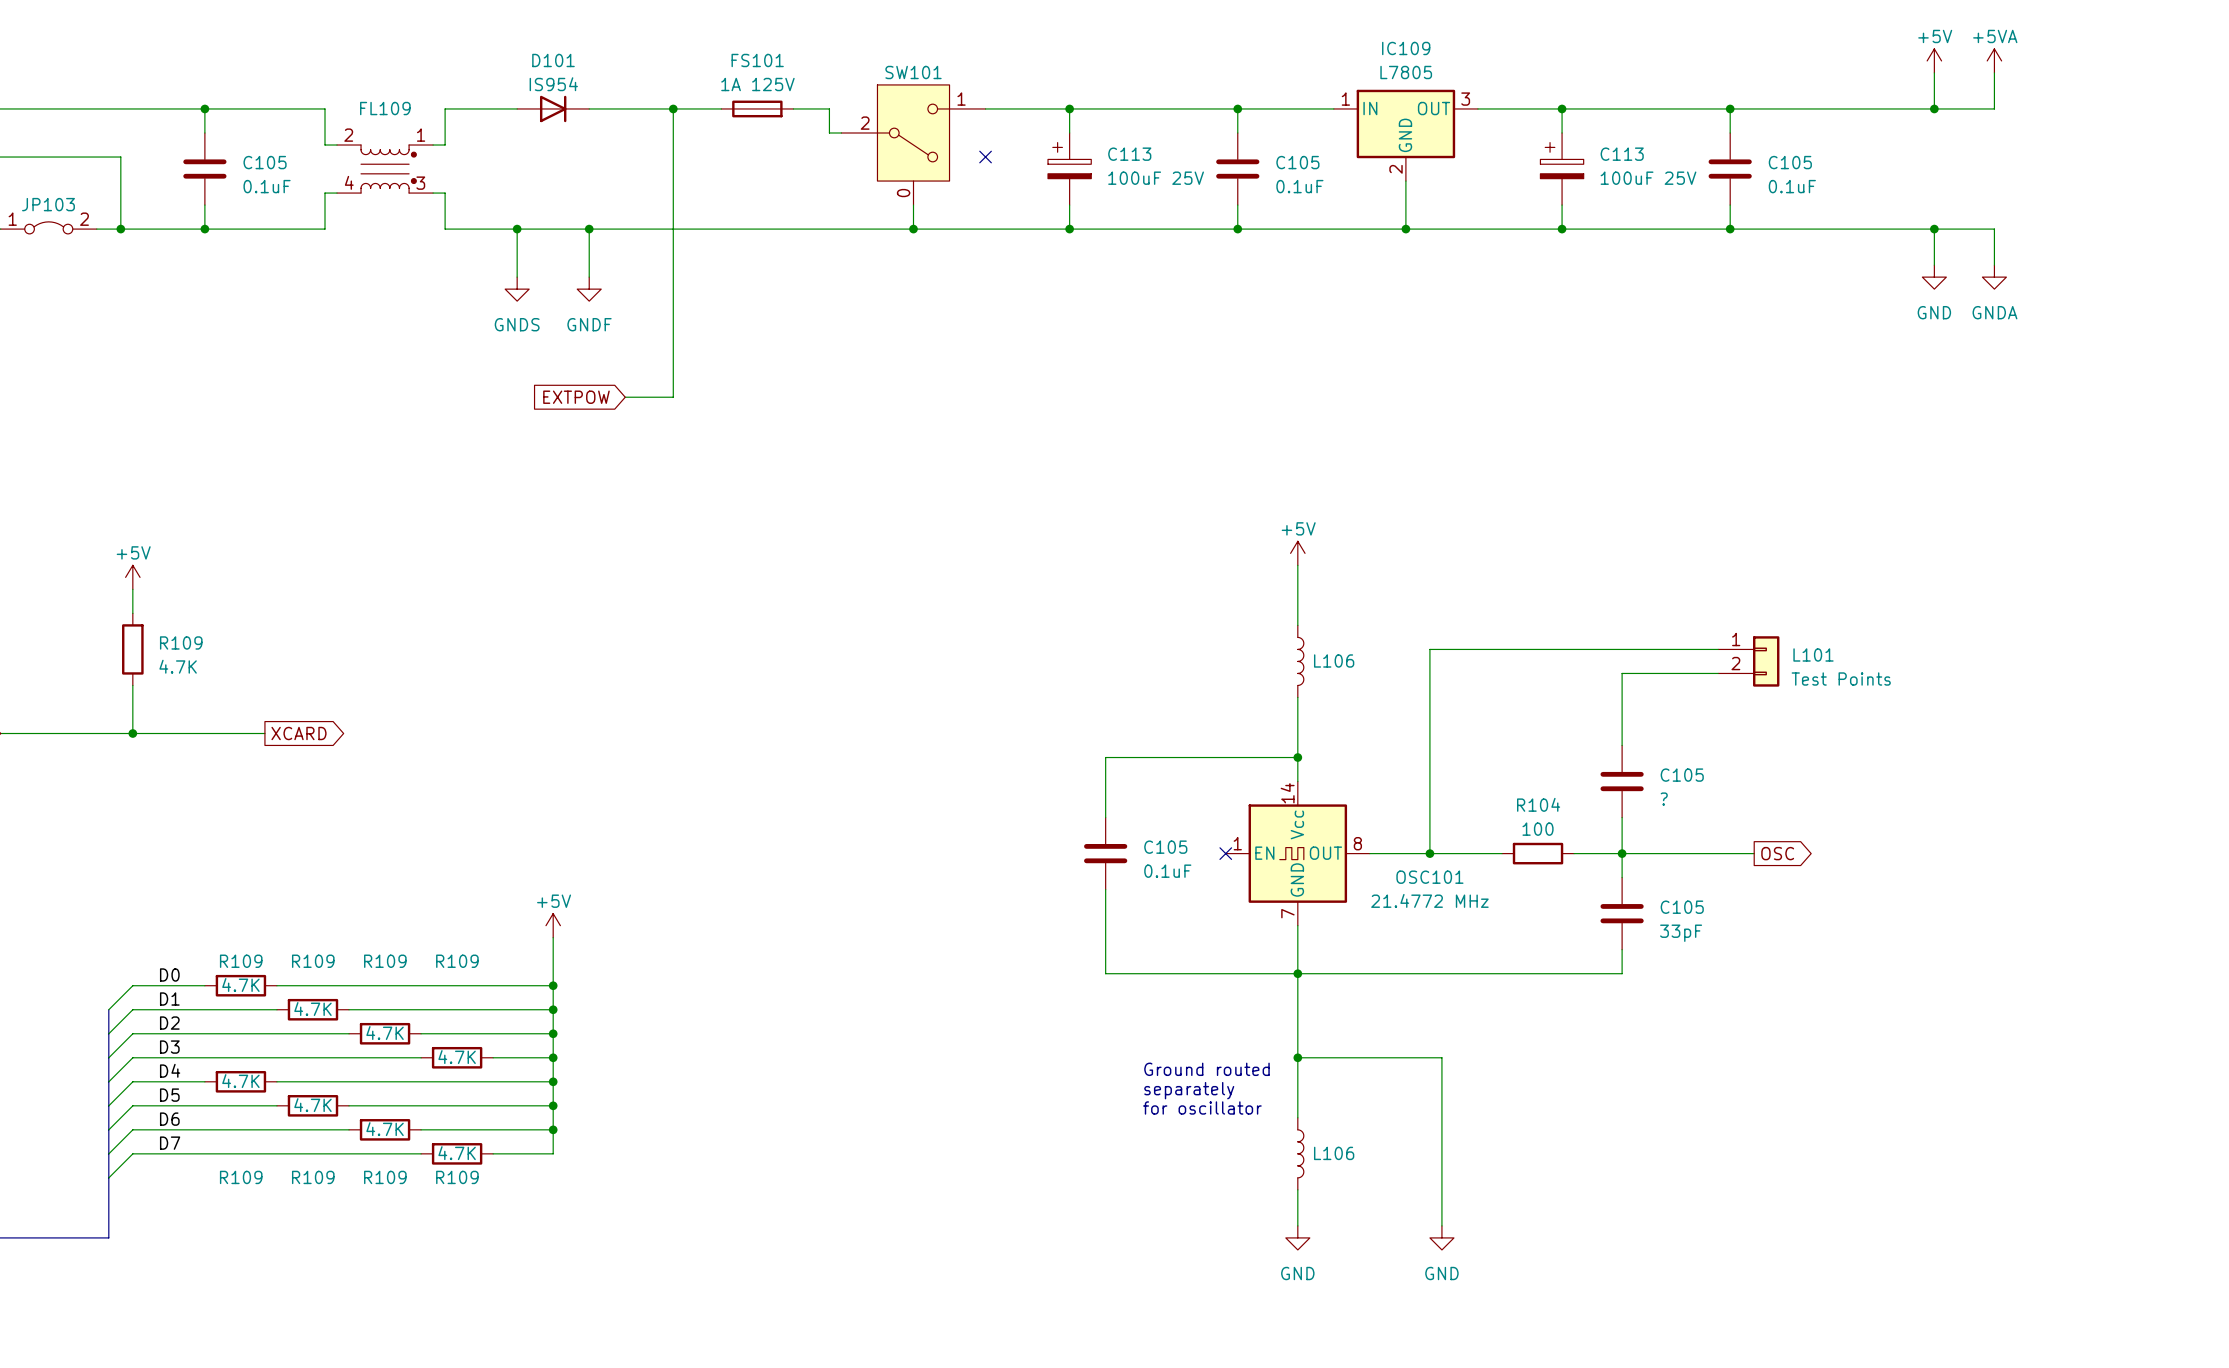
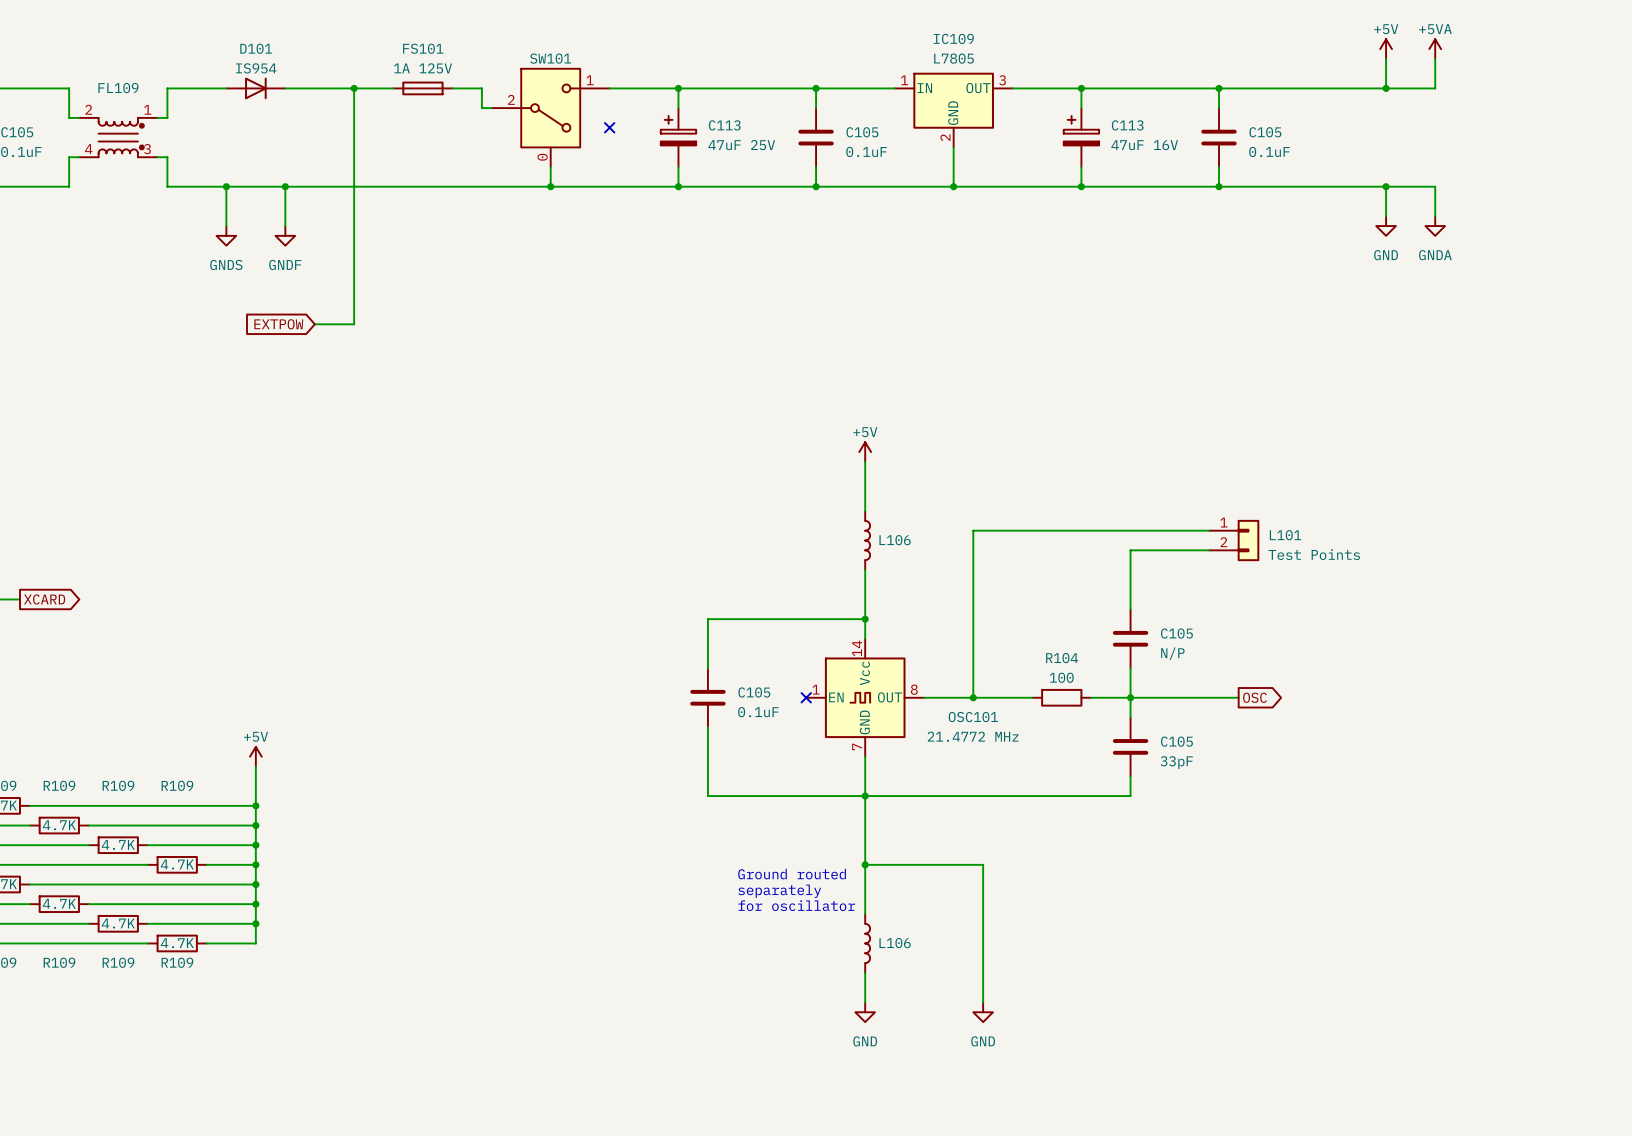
C113 value: 100uF 25V (1156, 178) -> 47uF 25V (741, 145)
C113 value: 100uF 25V (1648, 178) -> 47uF 16V (1144, 145)
C105 value: ? (1664, 799) -> N/P (1172, 653)

